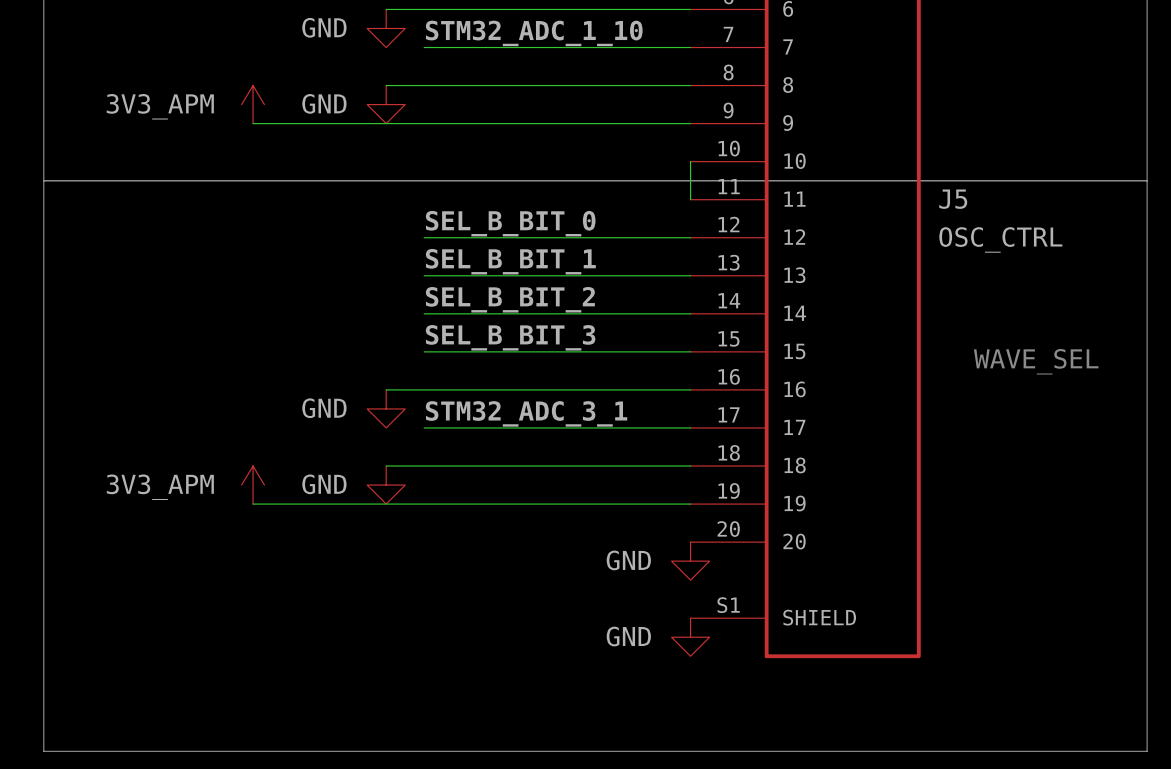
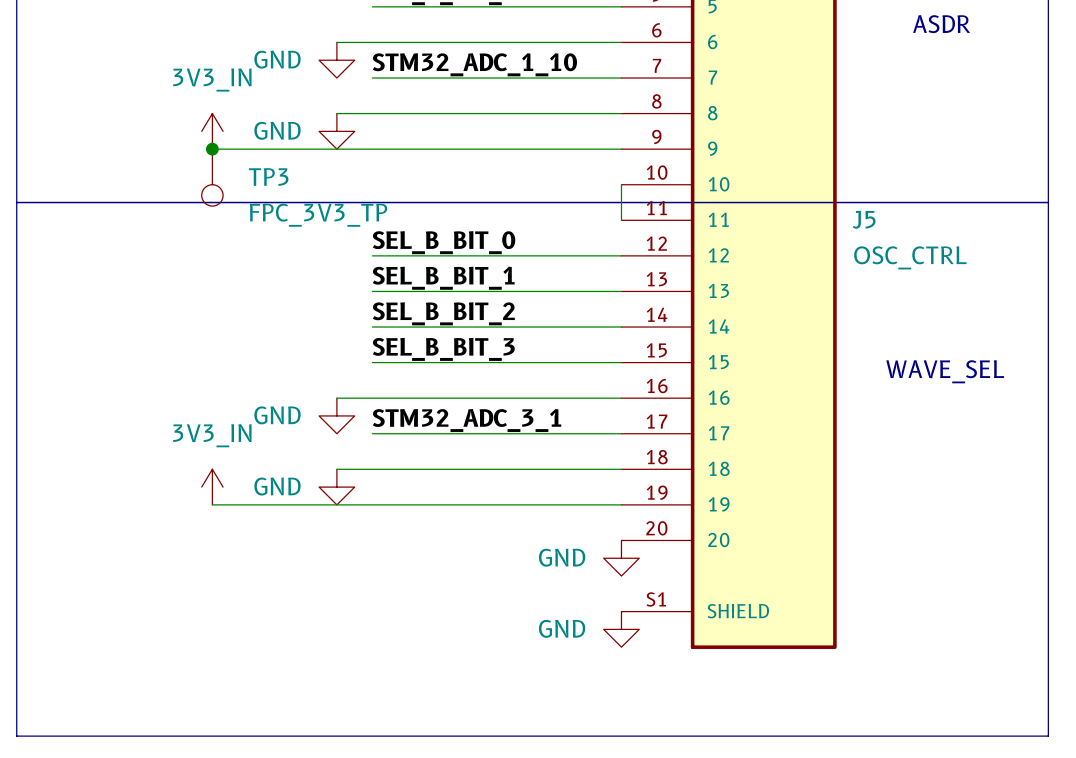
power symbol: 3V3_APM (253, 104) -> 3V3_IN (212, 131)
junction: none -> (212, 149)
TP3: none -> FPC_3V3_TP (212, 177)
power symbol: 3V3_APM (253, 485) -> 3V3_IN (212, 487)

